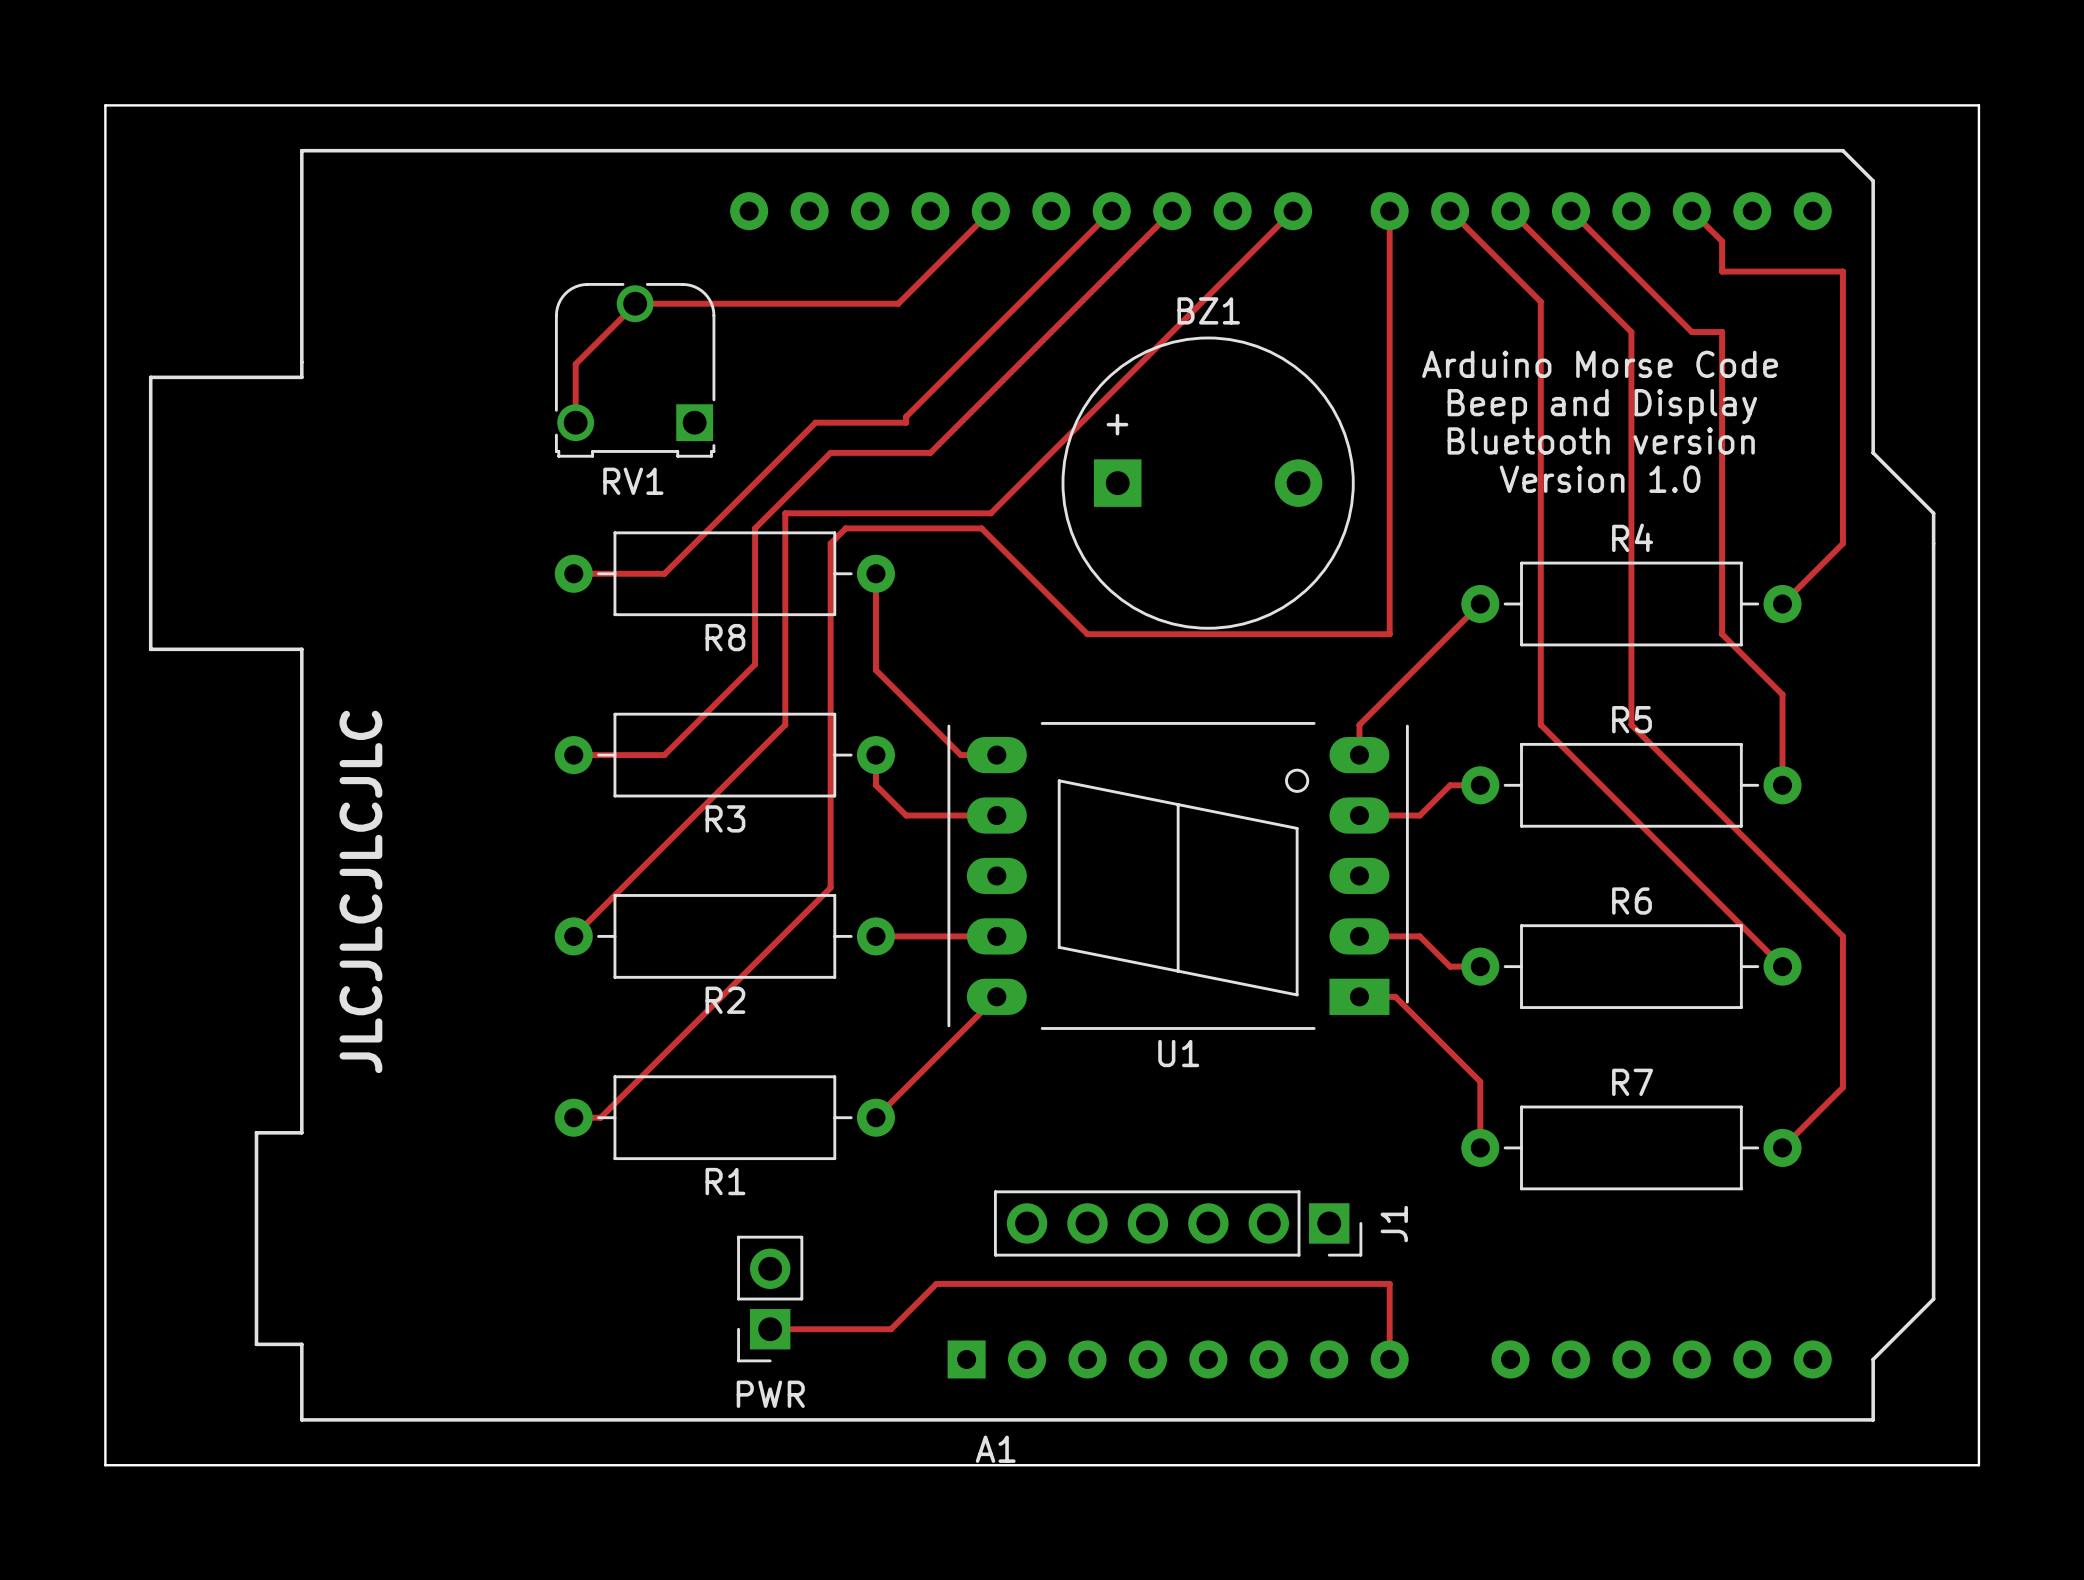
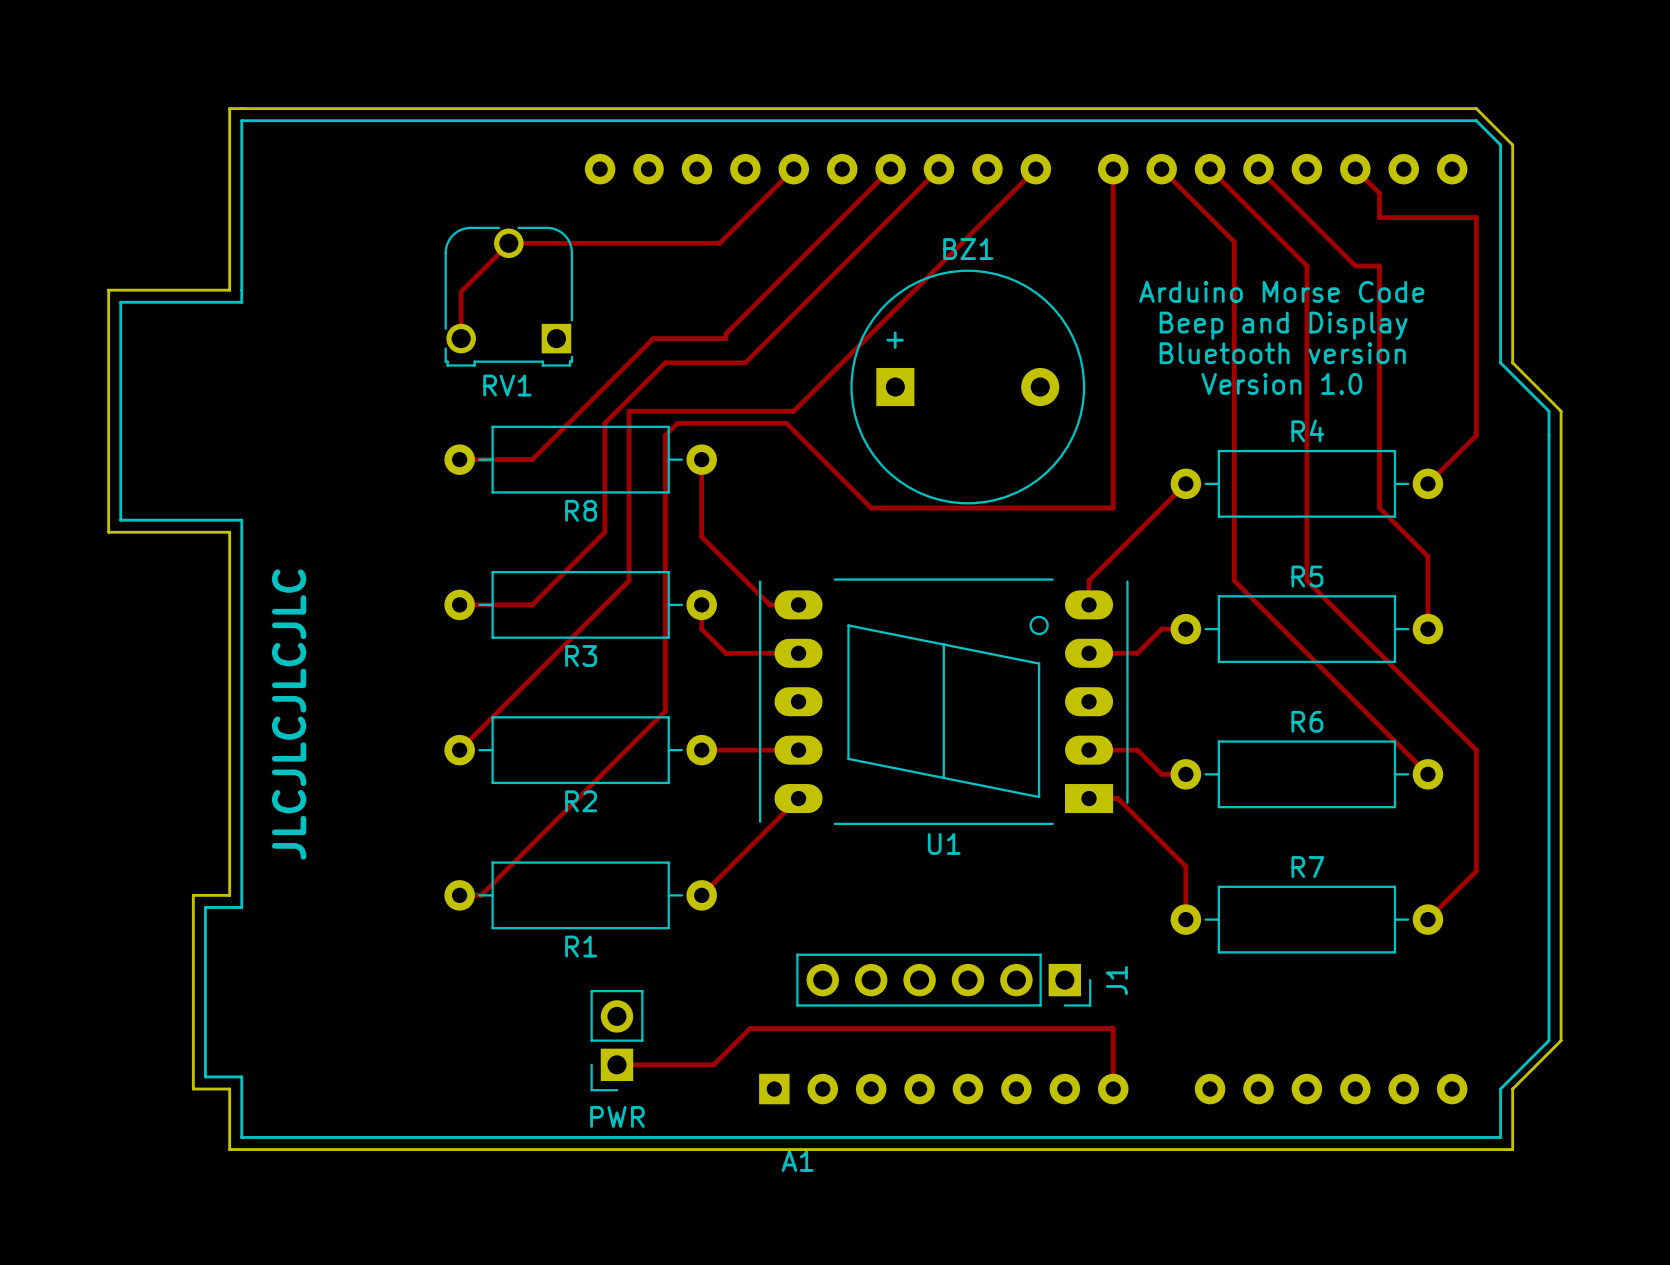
board edge: (105, 105) (1978, 105) (1978, 1465) (105, 1465) (105, 105) -> (229, 108) (229, 290) (108, 290) (108, 532) (229, 532) (229, 895) (193, 895) (193, 1089) (229, 1089) (229, 1149) (1512, 1149) (1512, 1089) (1561, 1040) (1561, 411) (1512, 362) (1512, 144) (1476, 108) (229, 108)

